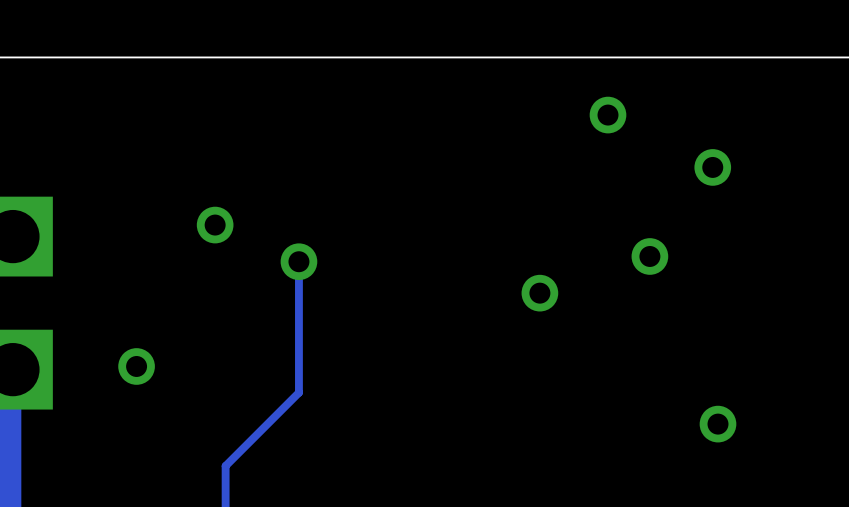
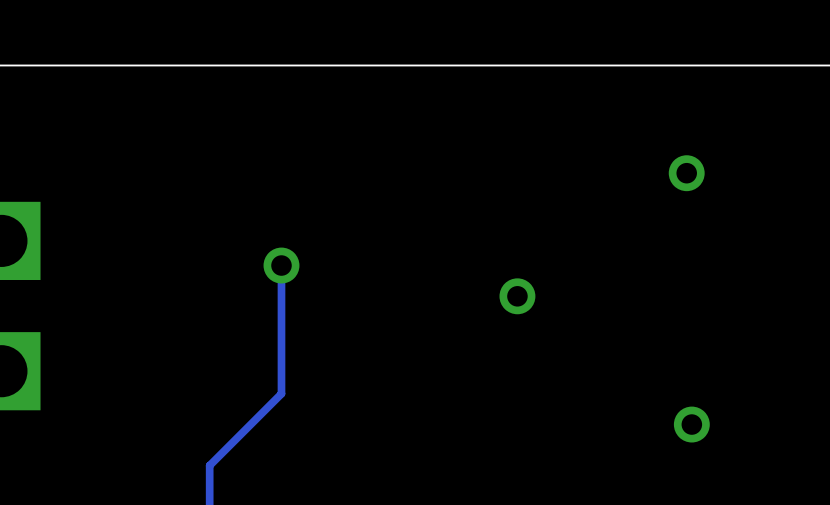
via: (607, 115) -> none
via: (215, 225) -> none
via: (649, 256) -> none
via: (136, 366) -> none

